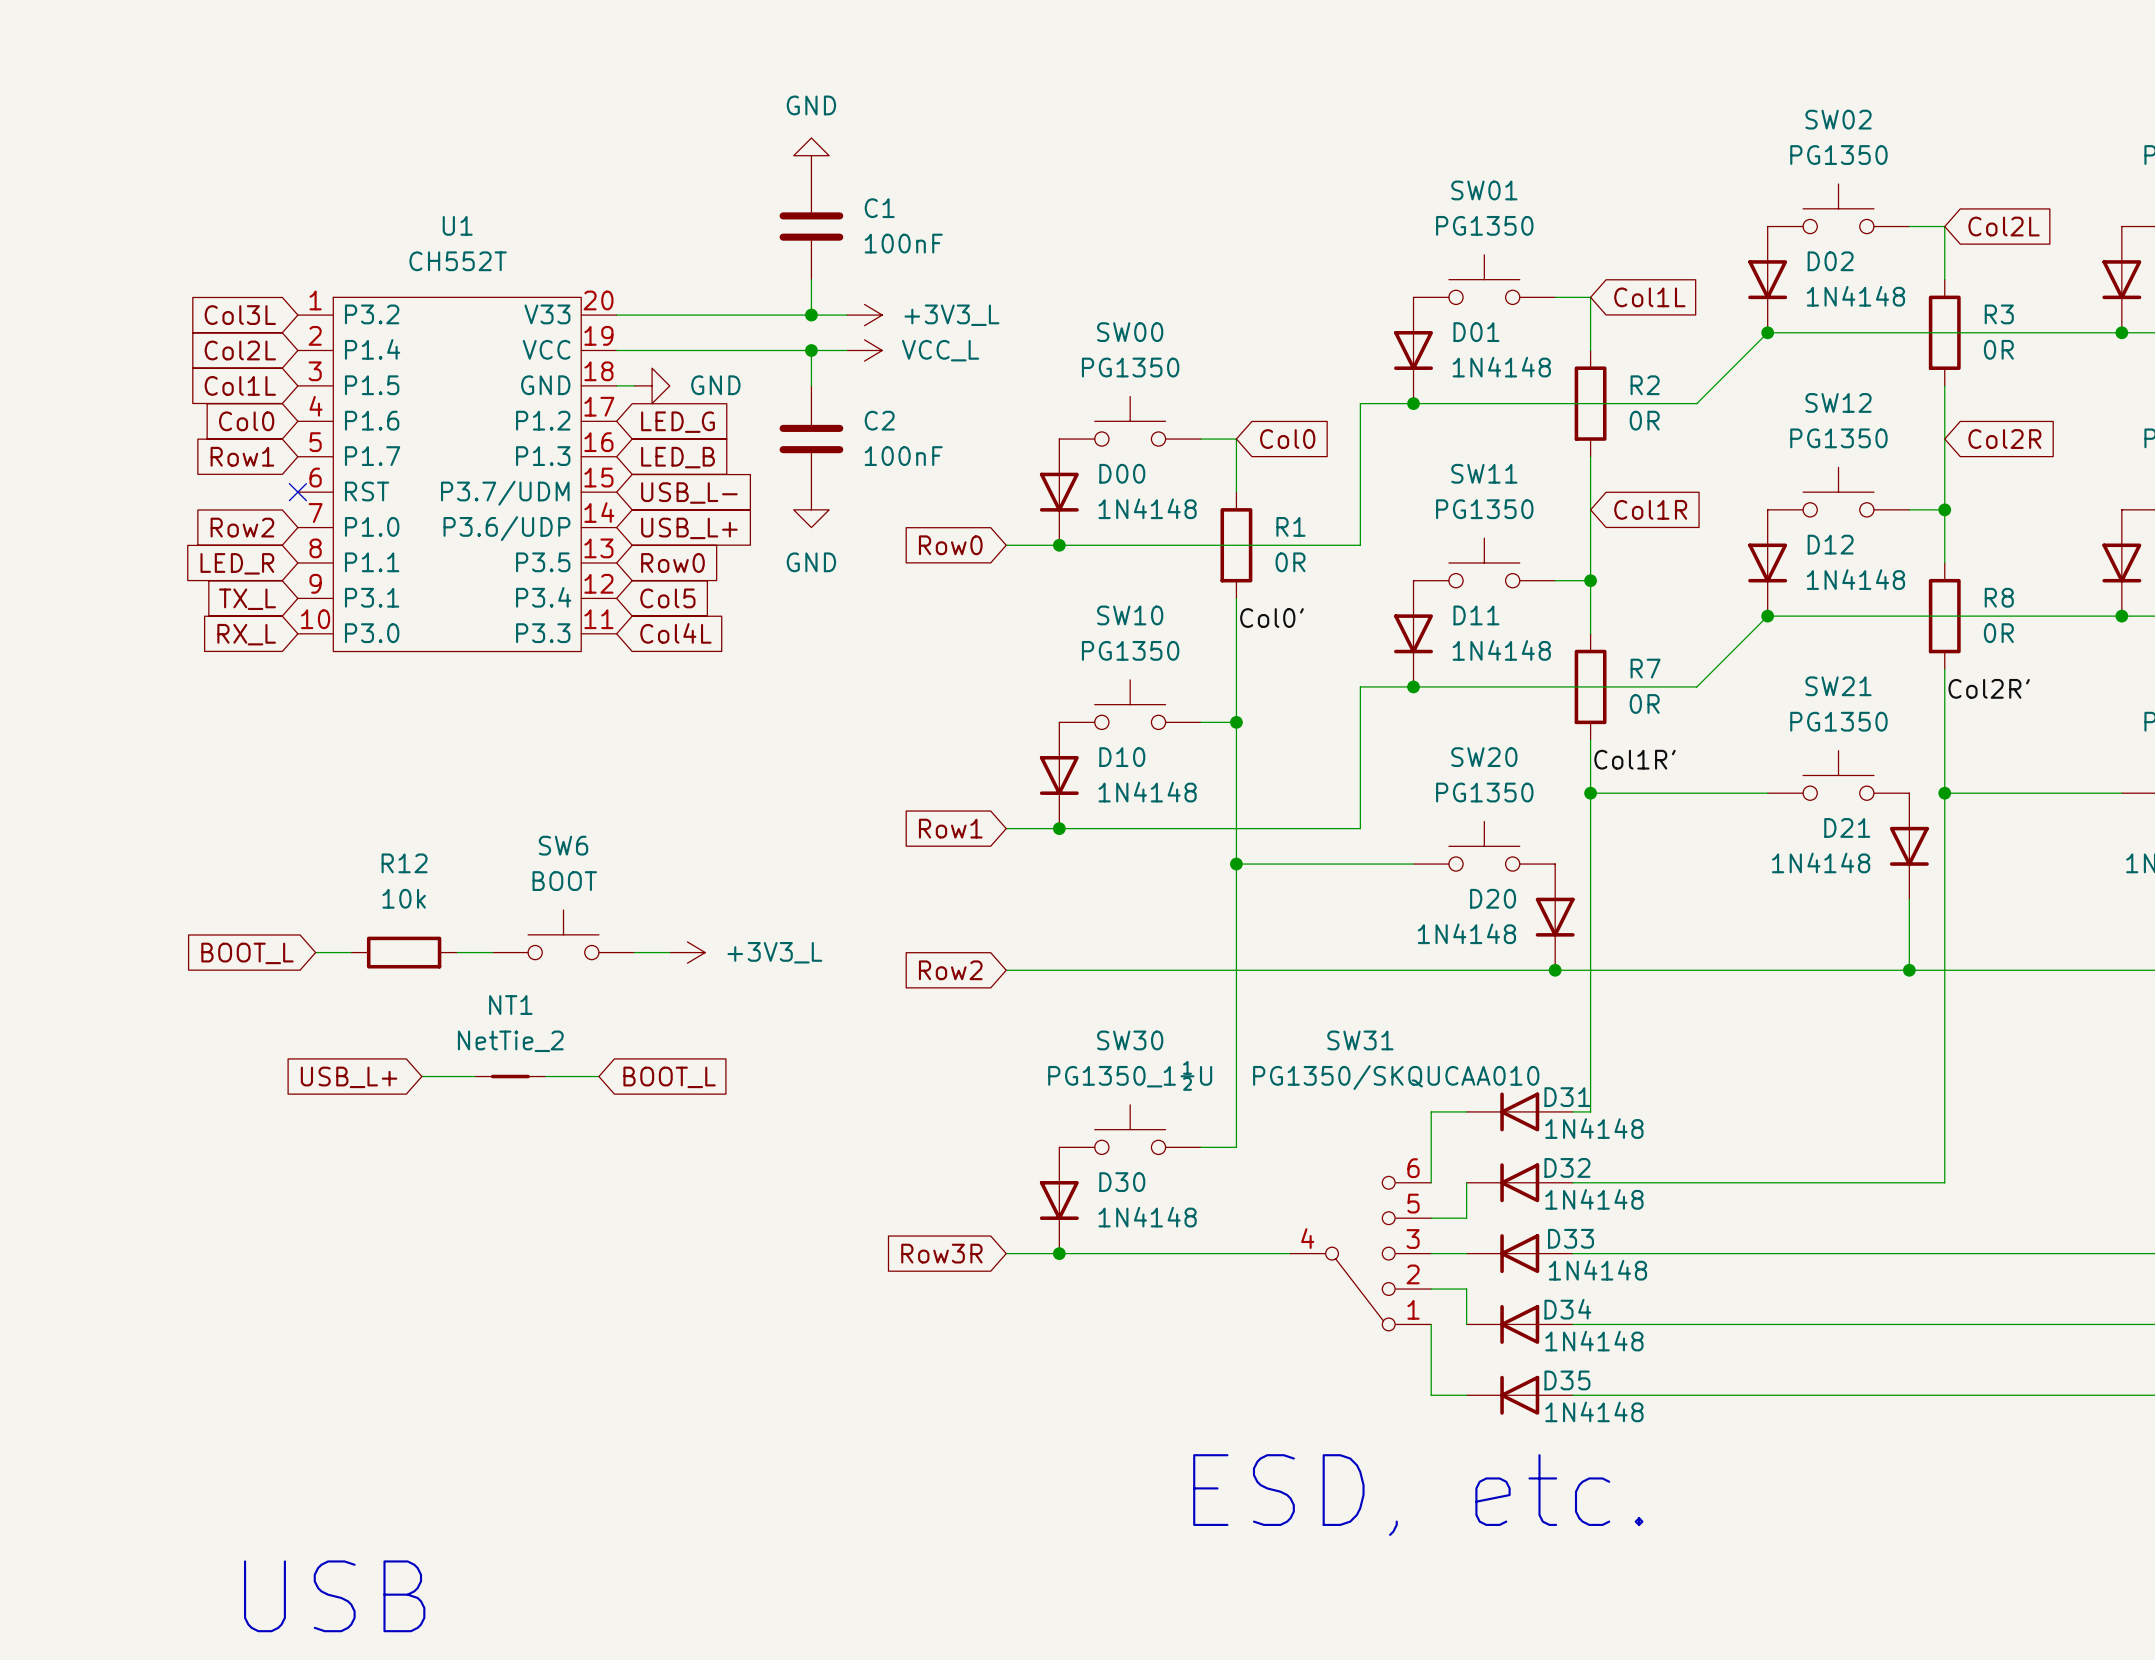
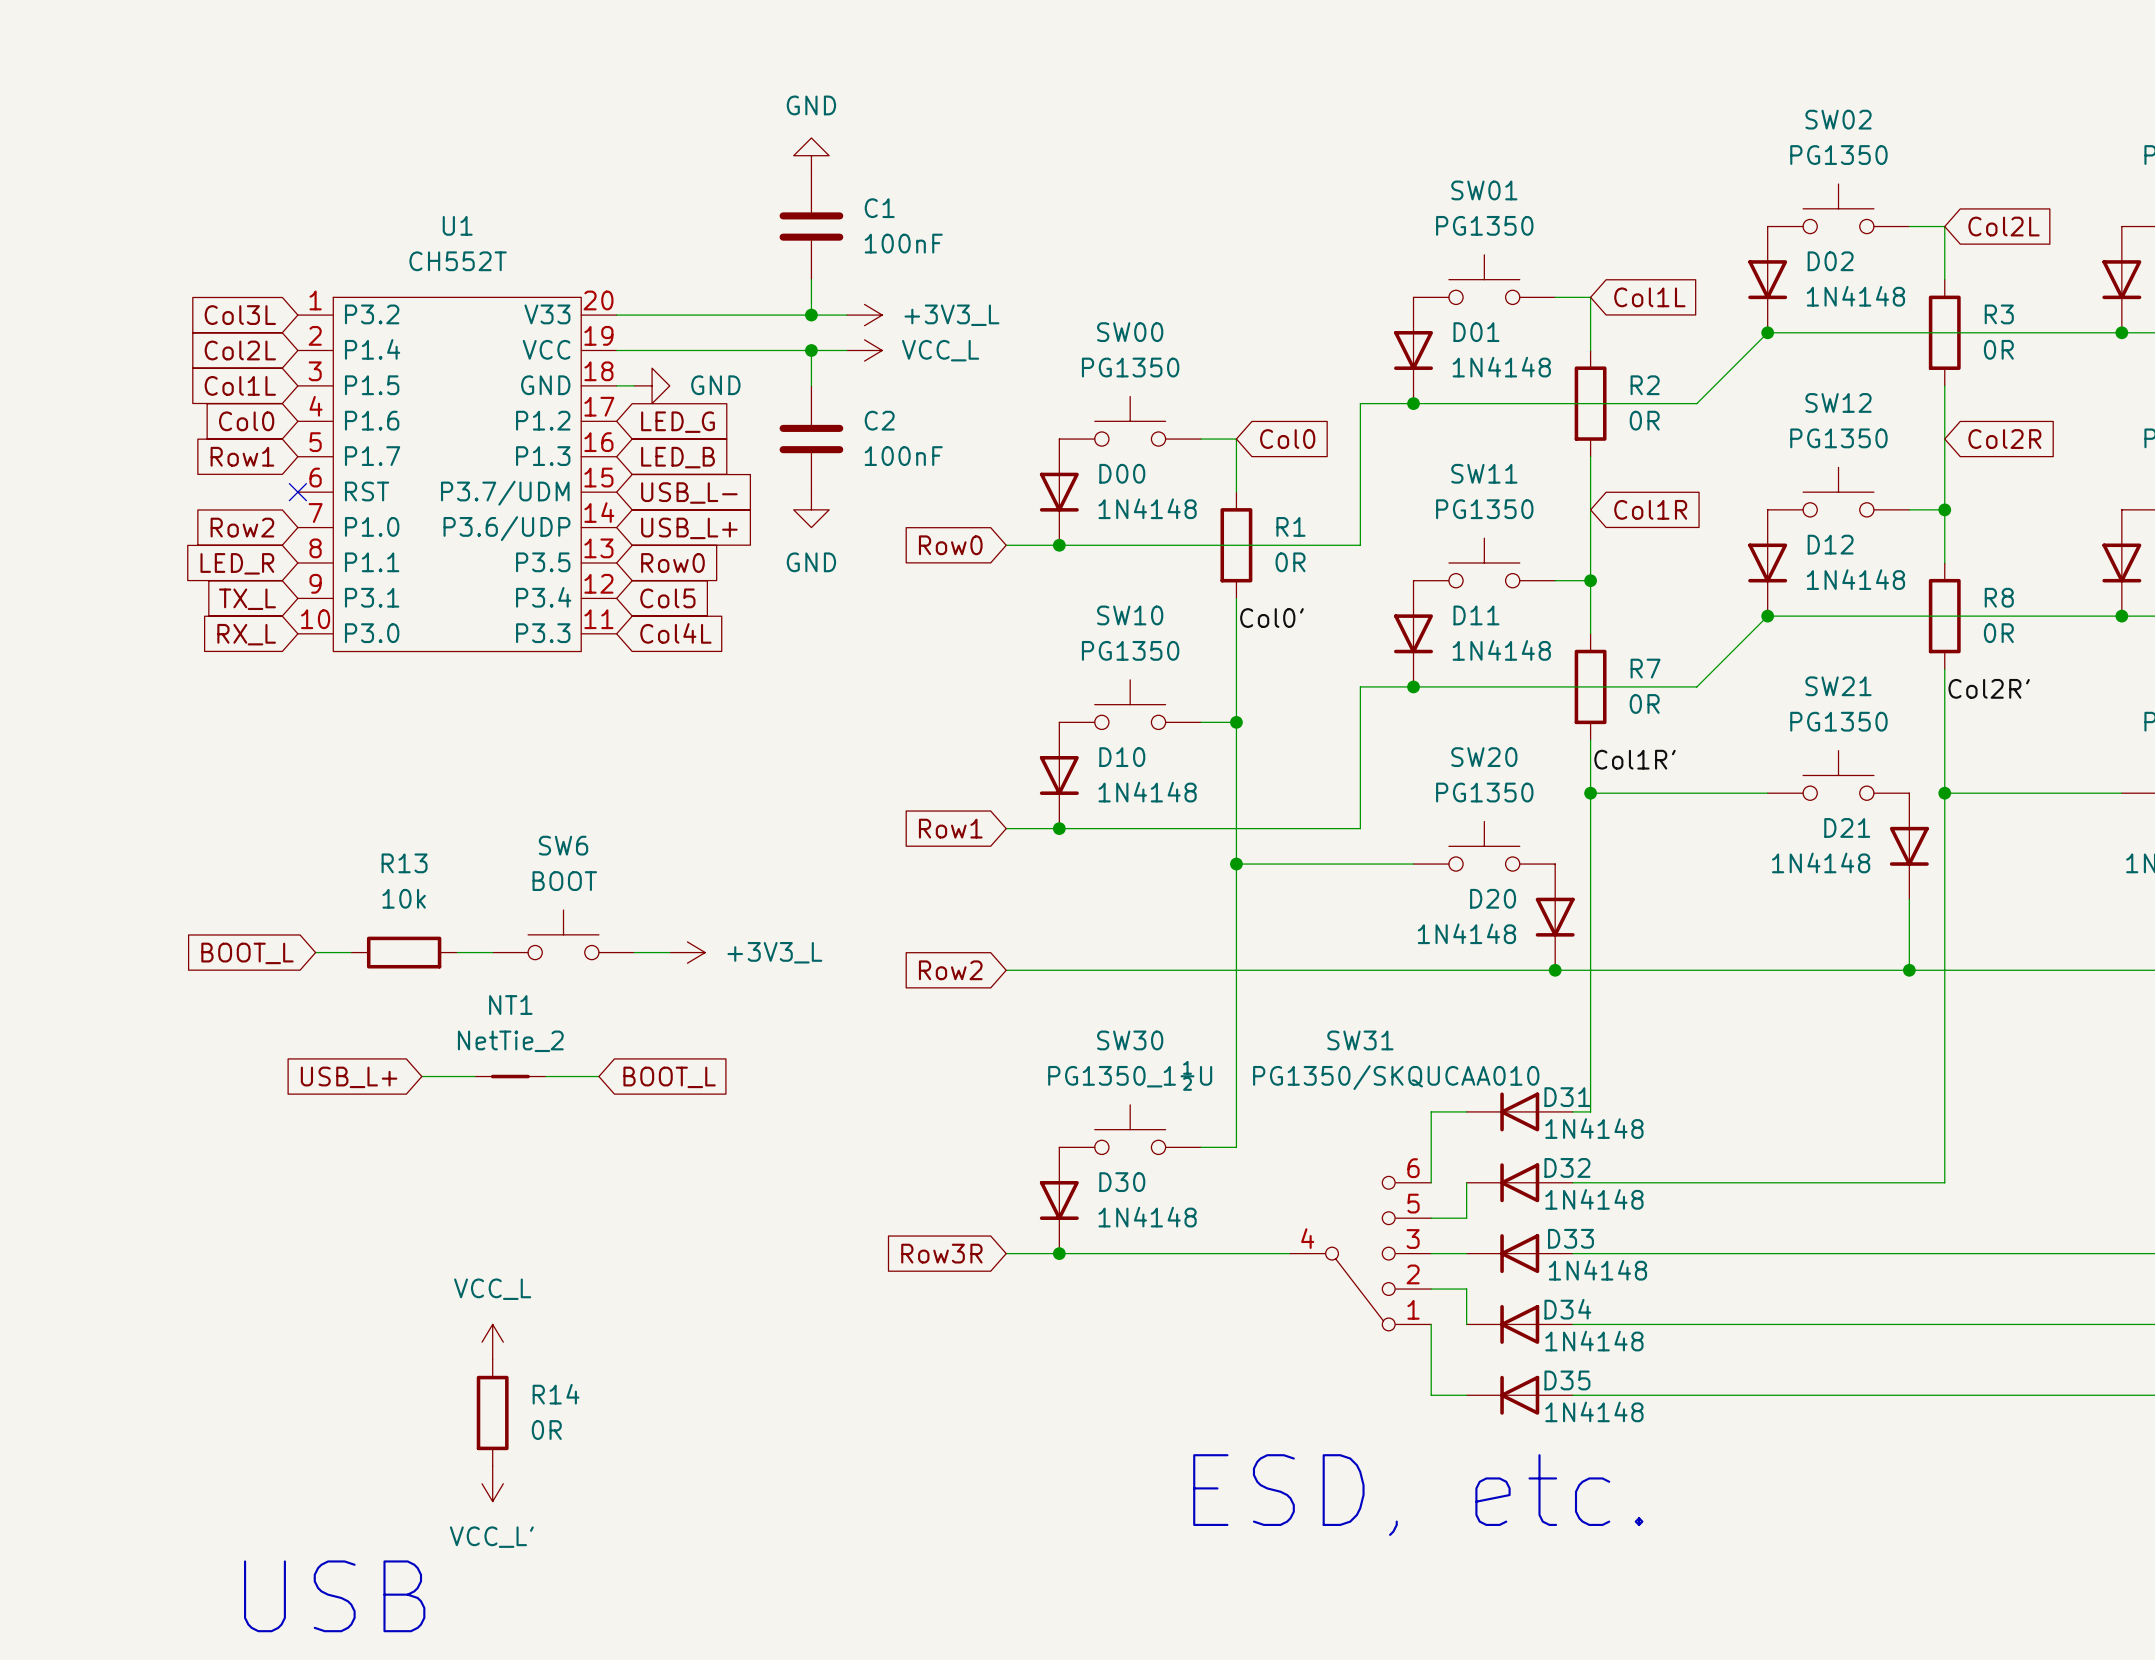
R12 name: R12 (404, 863) -> R13 (404, 863)
power symbol: none -> VCC_L (492, 1342)
R14: none -> 0R (492, 1412)
power symbol: none -> VCC_L' (492, 1483)

